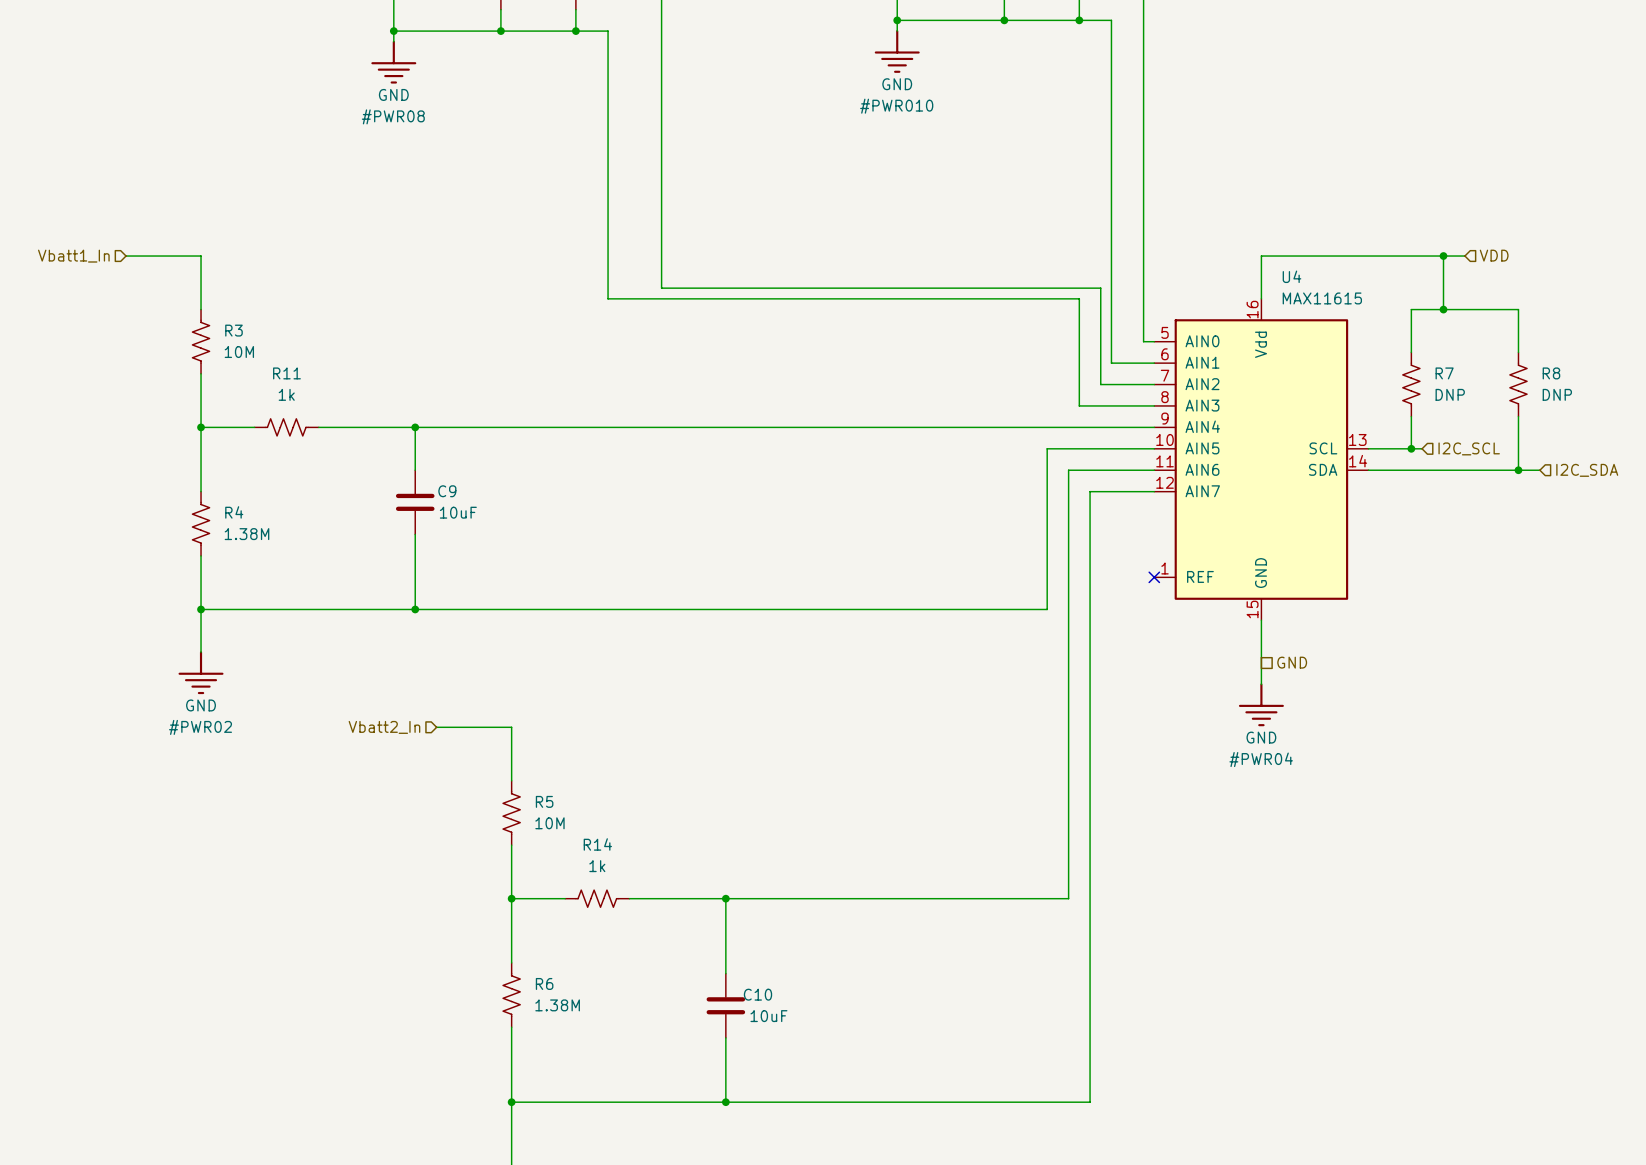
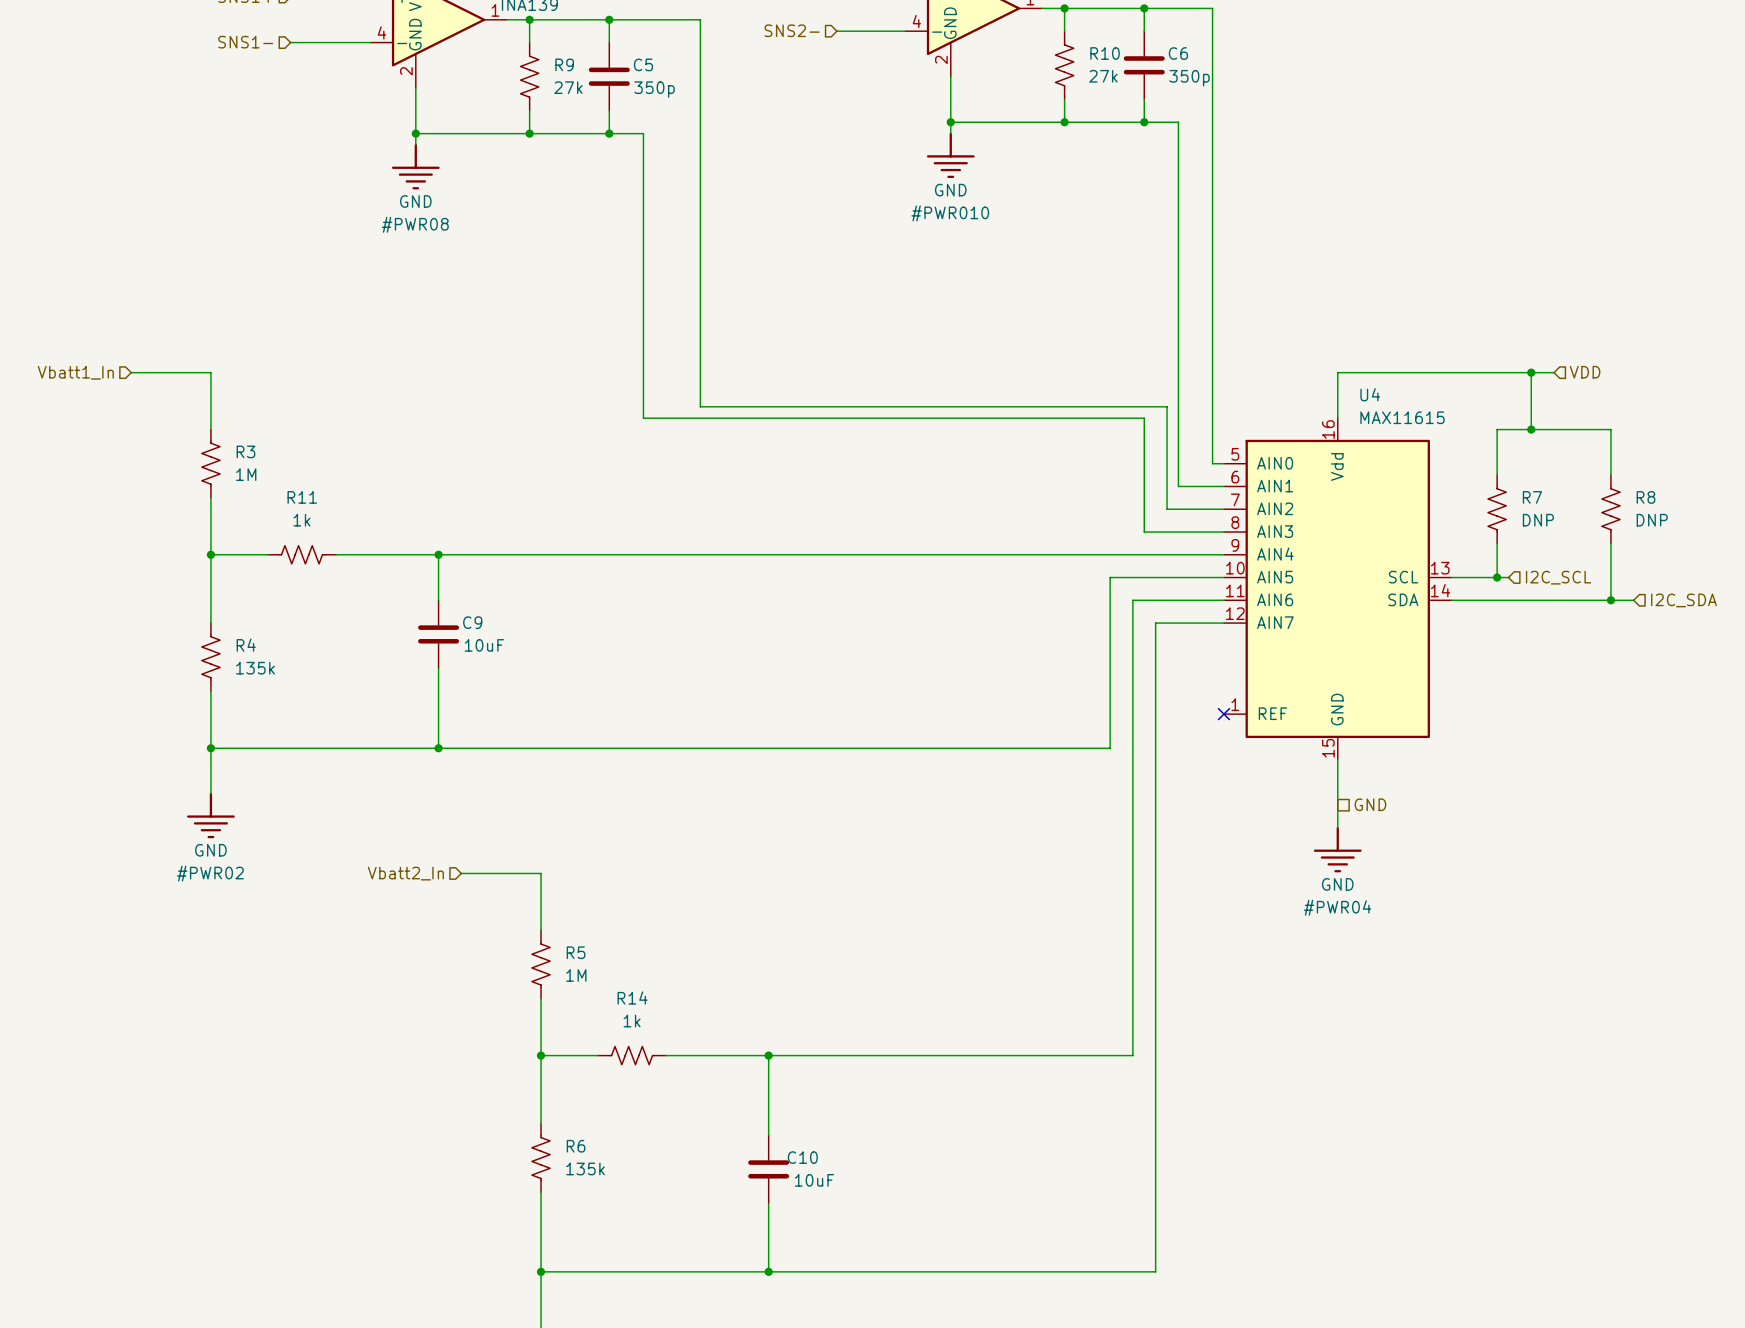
R3 value: 10M (239, 352) -> 1M (246, 474)
R4 value: 1.38M (247, 534) -> 135k (255, 668)
R5 value: 10M (549, 823) -> 1M (576, 975)
R6 value: 1.38M (557, 1005) -> 135k (585, 1168)

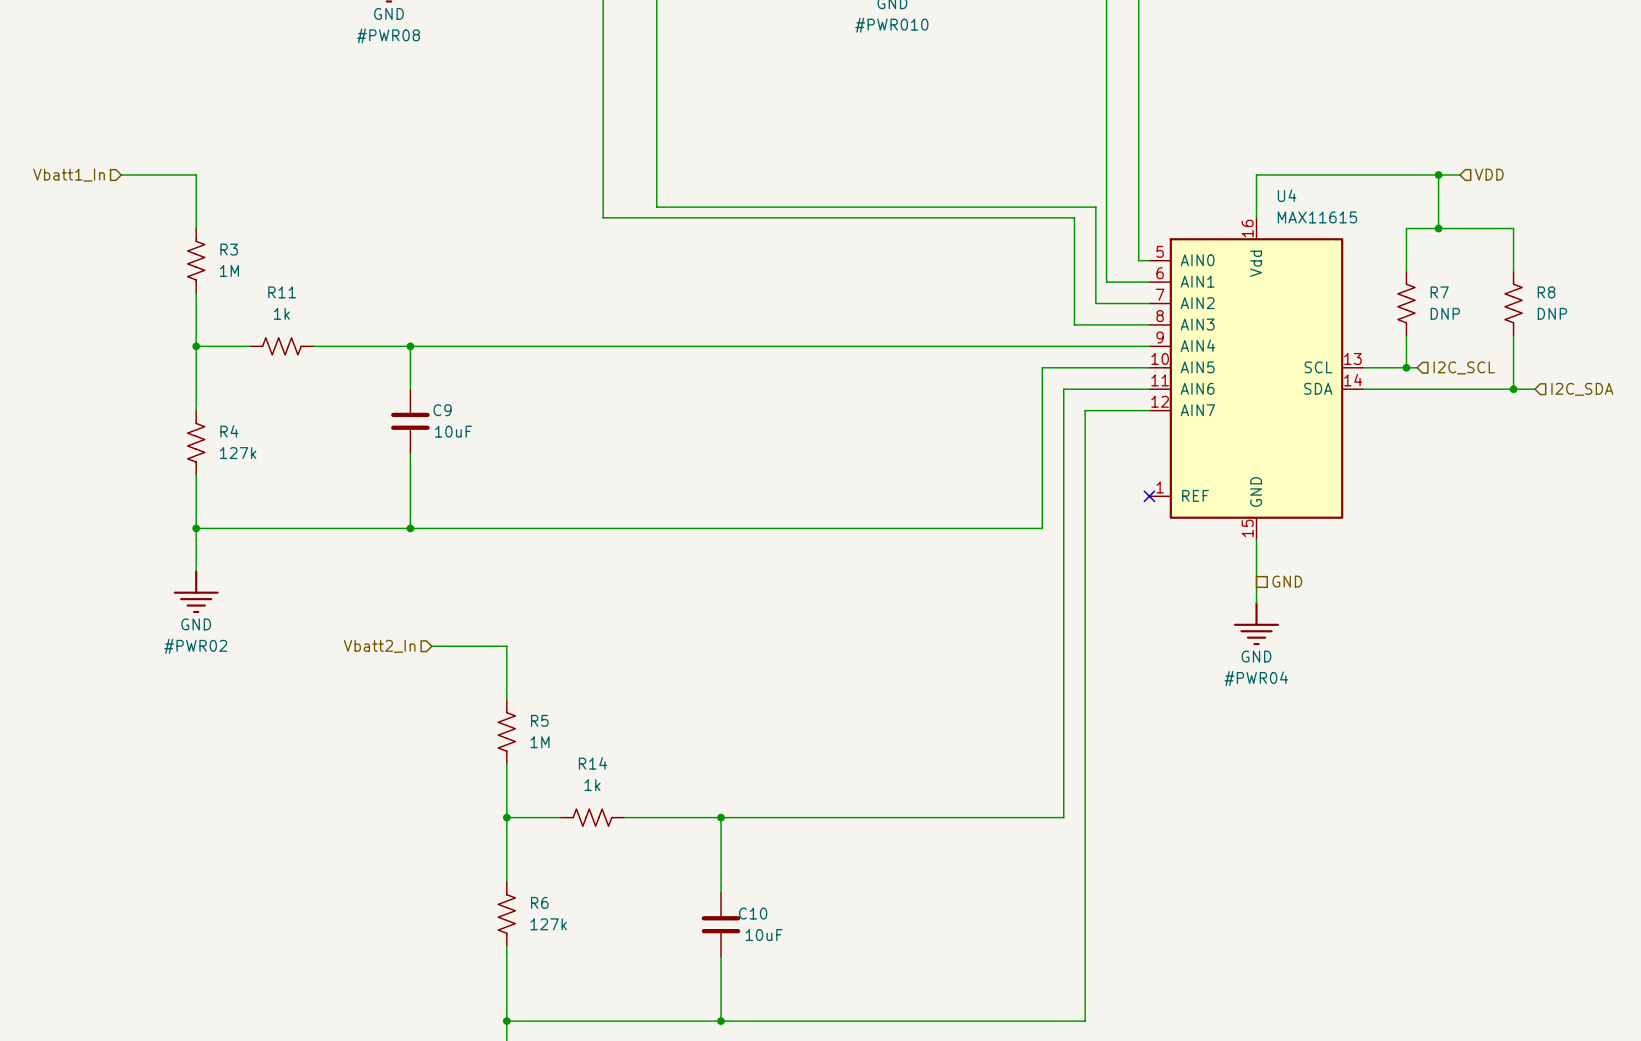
R4 value: 135k (255, 668) -> 127k (238, 453)
R6 value: 135k (585, 1168) -> 127k (548, 924)

